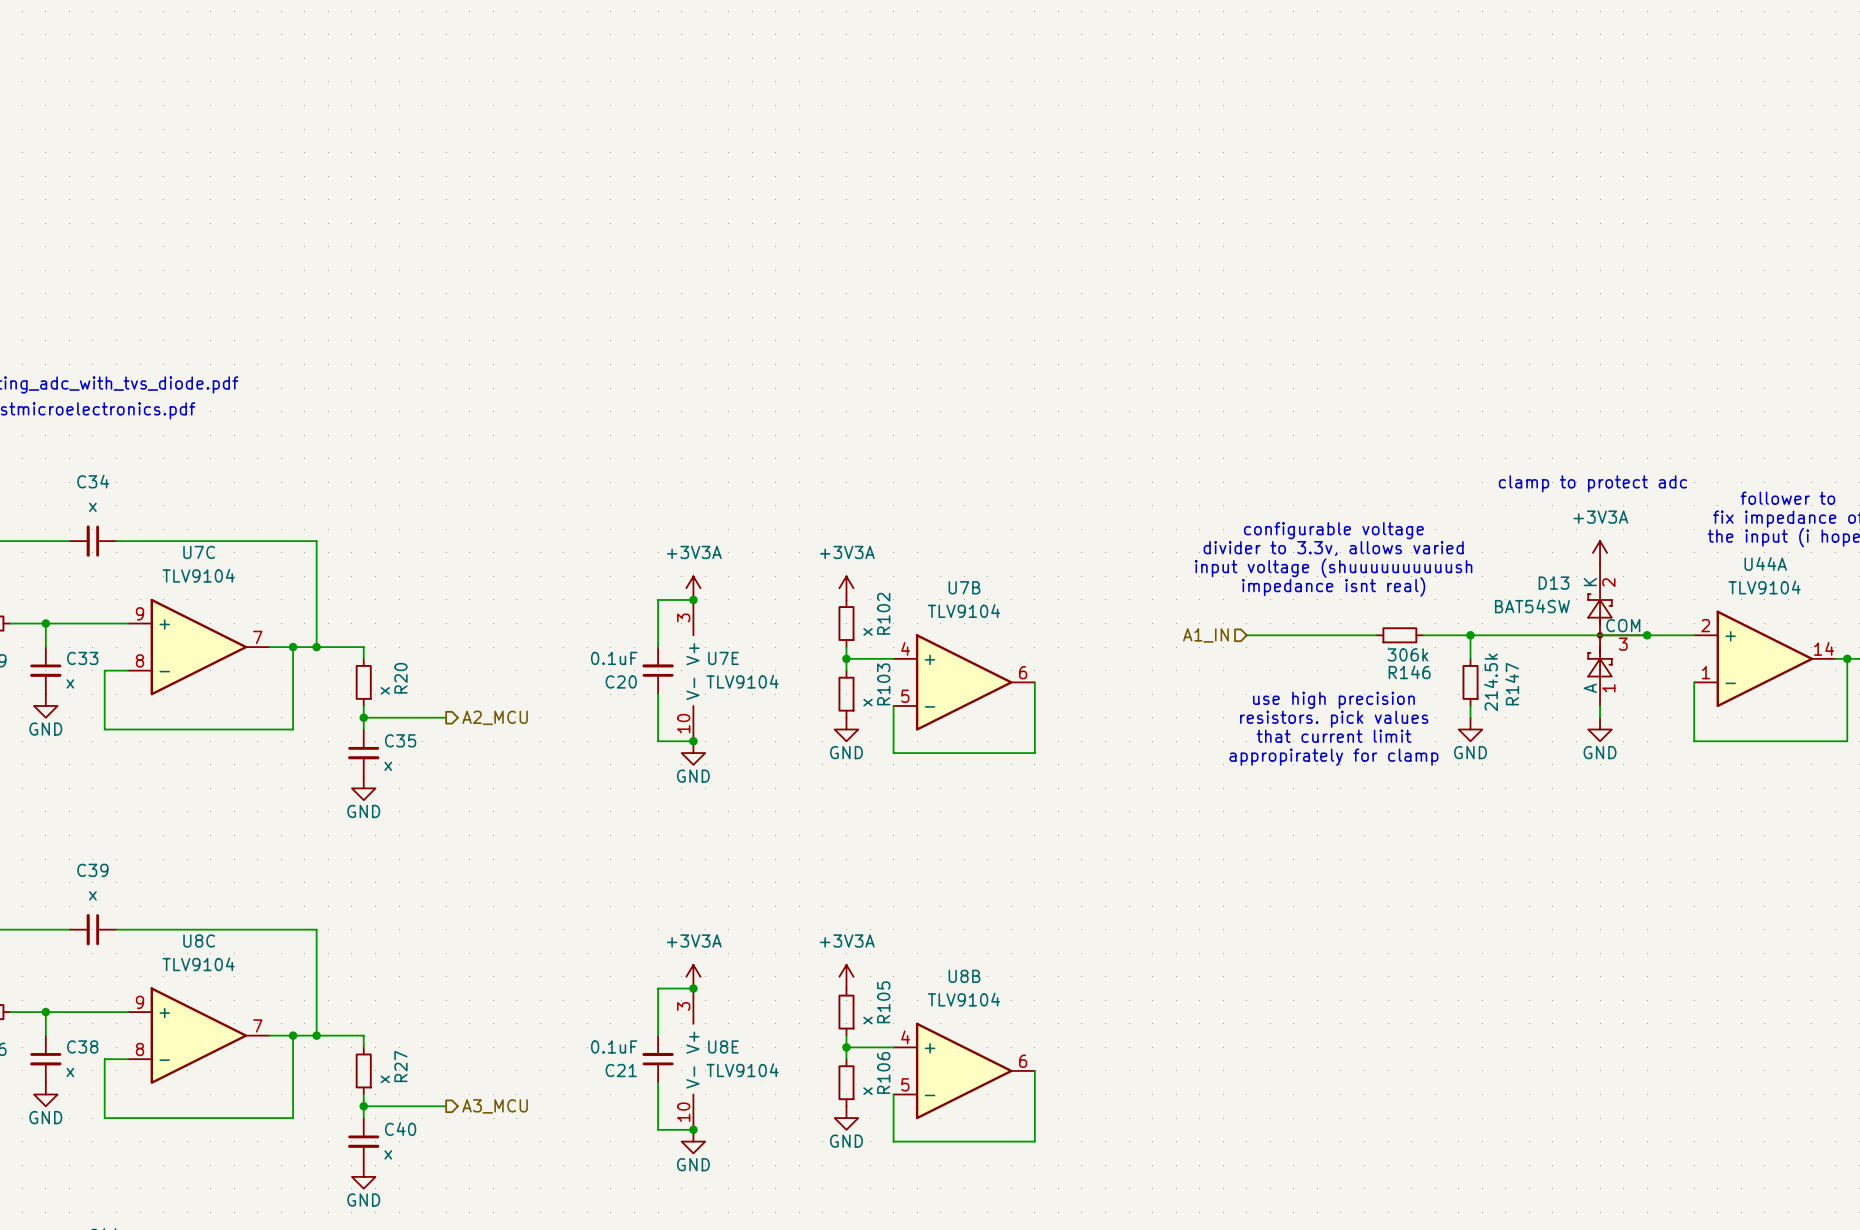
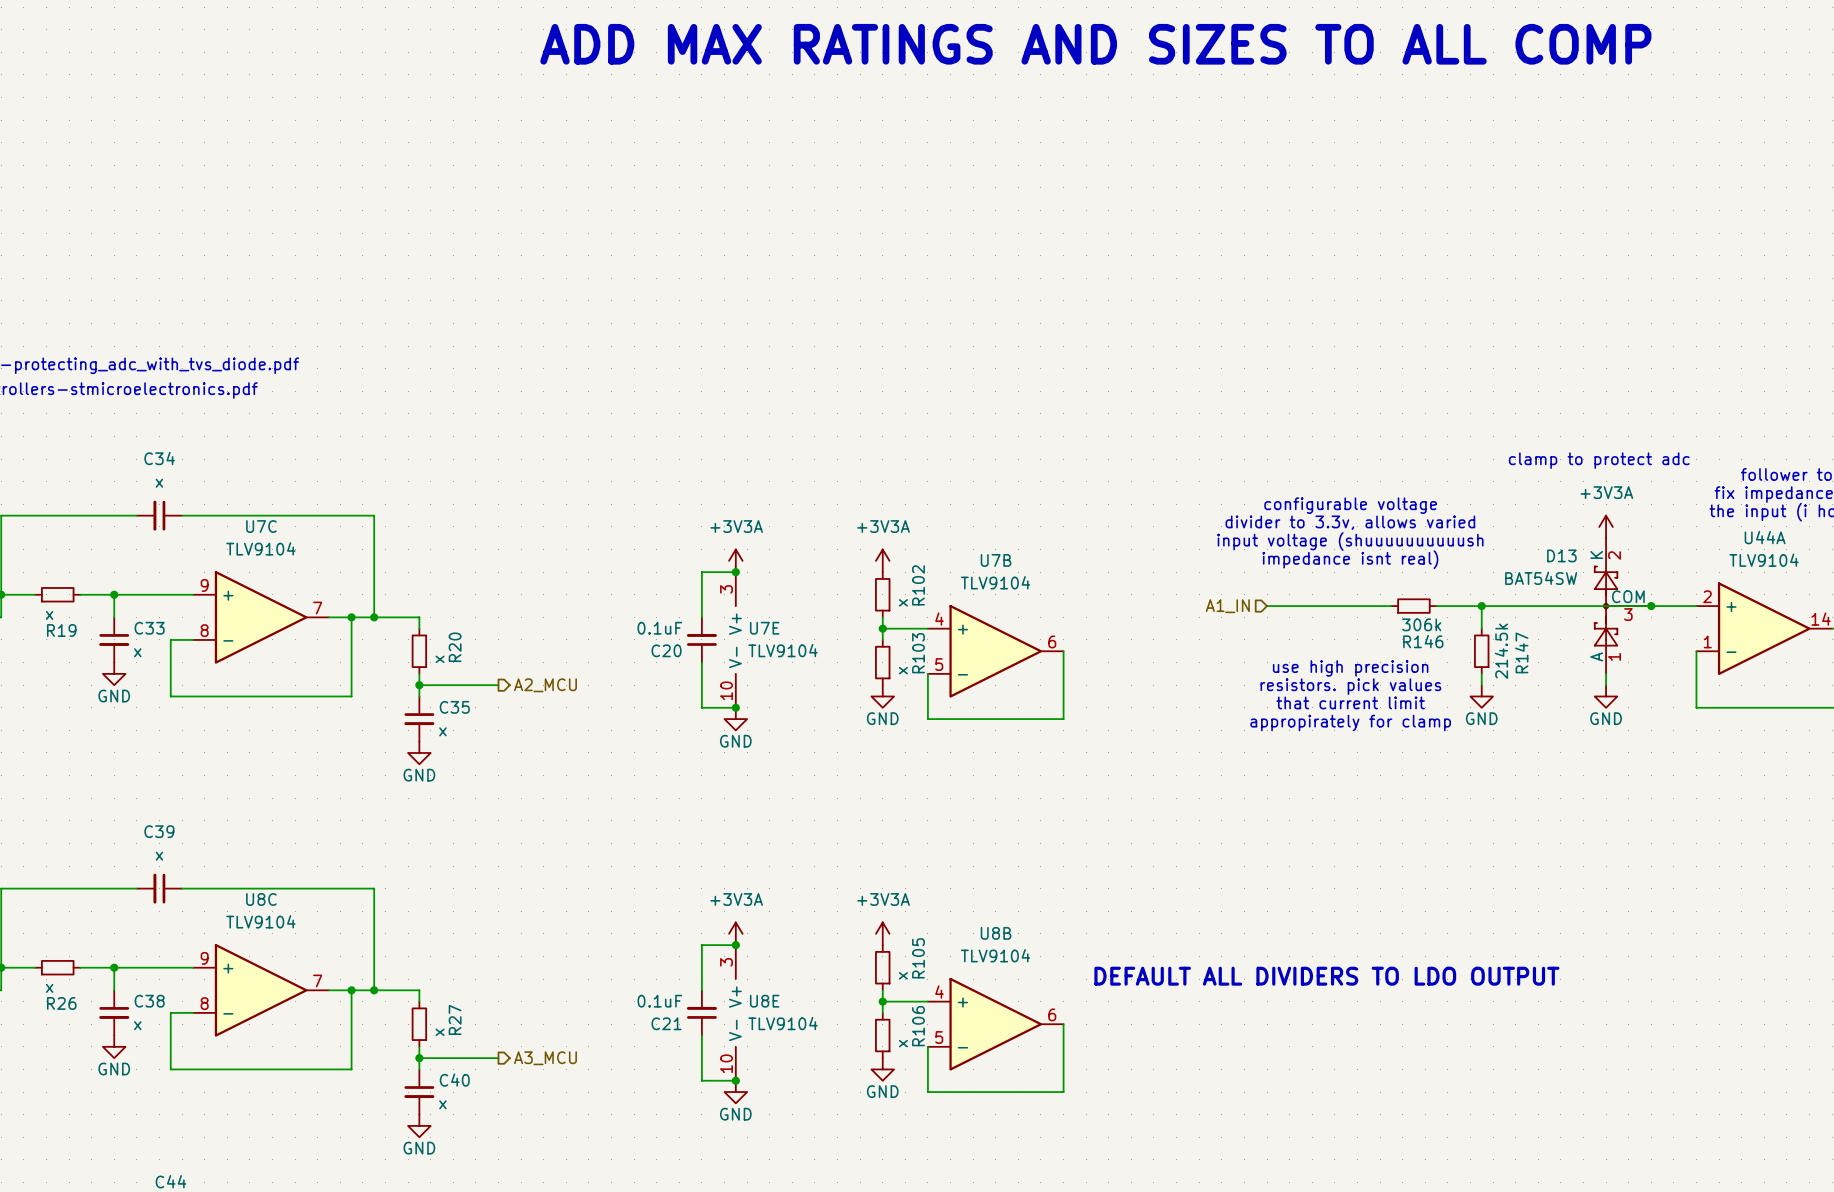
text: none -> ADD MAX RATINGS AND SIZES TO ALL COMP (1095, 44)
text: none -> DEFAULT ALL DIVIDERS TO LDO OUTPUT (1326, 976)

